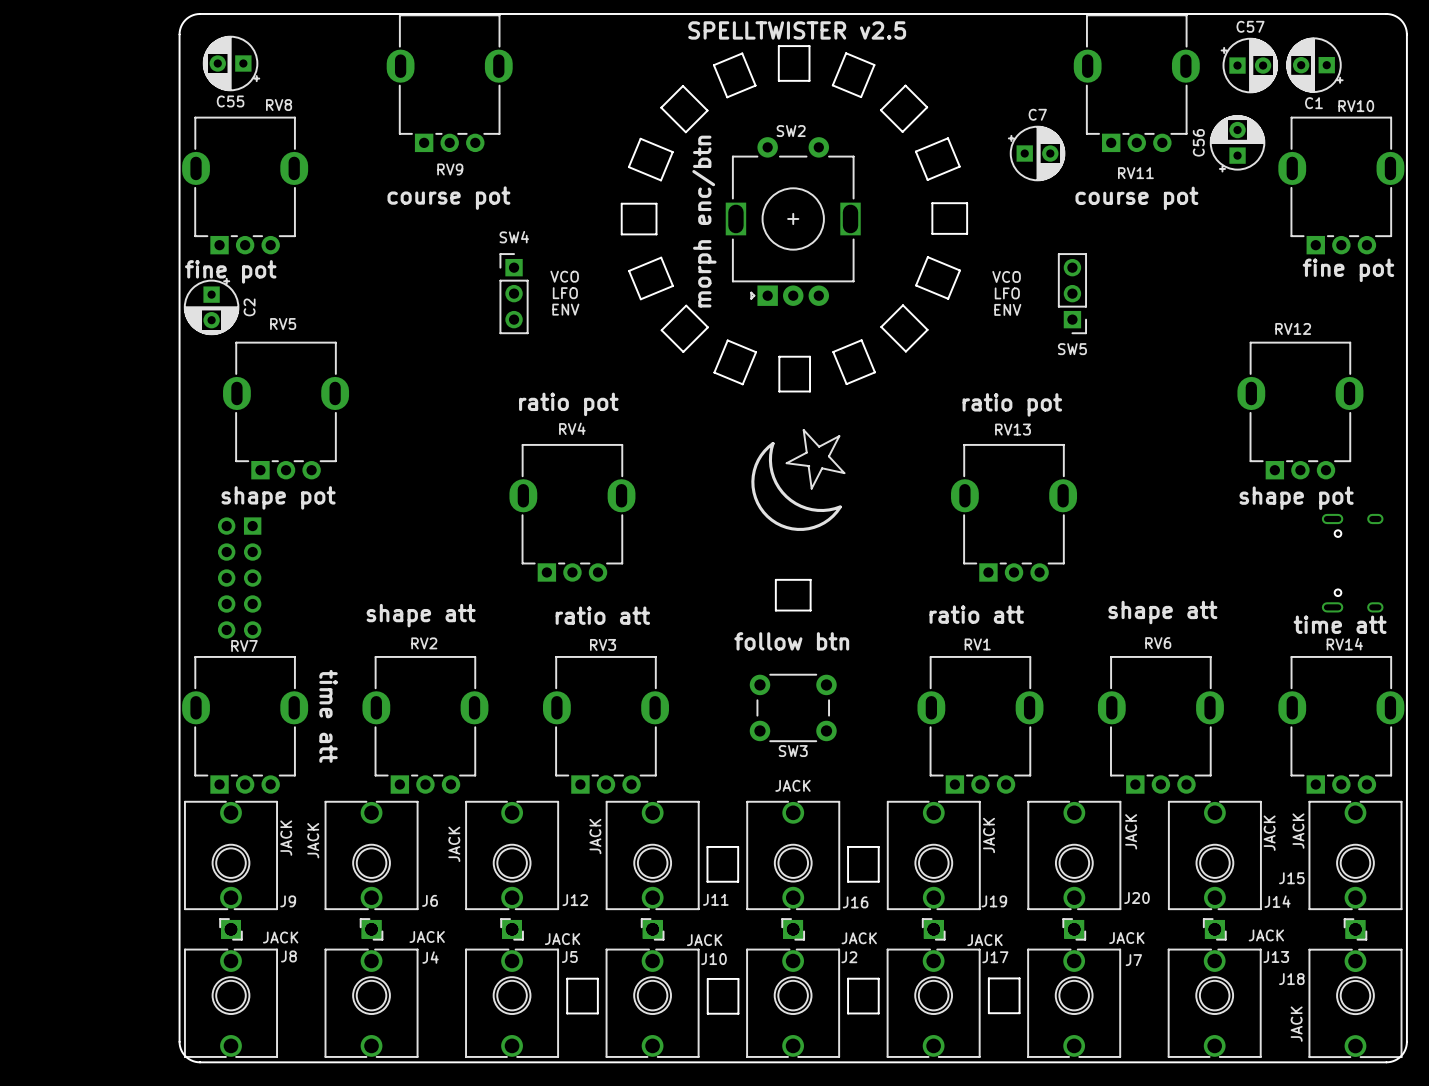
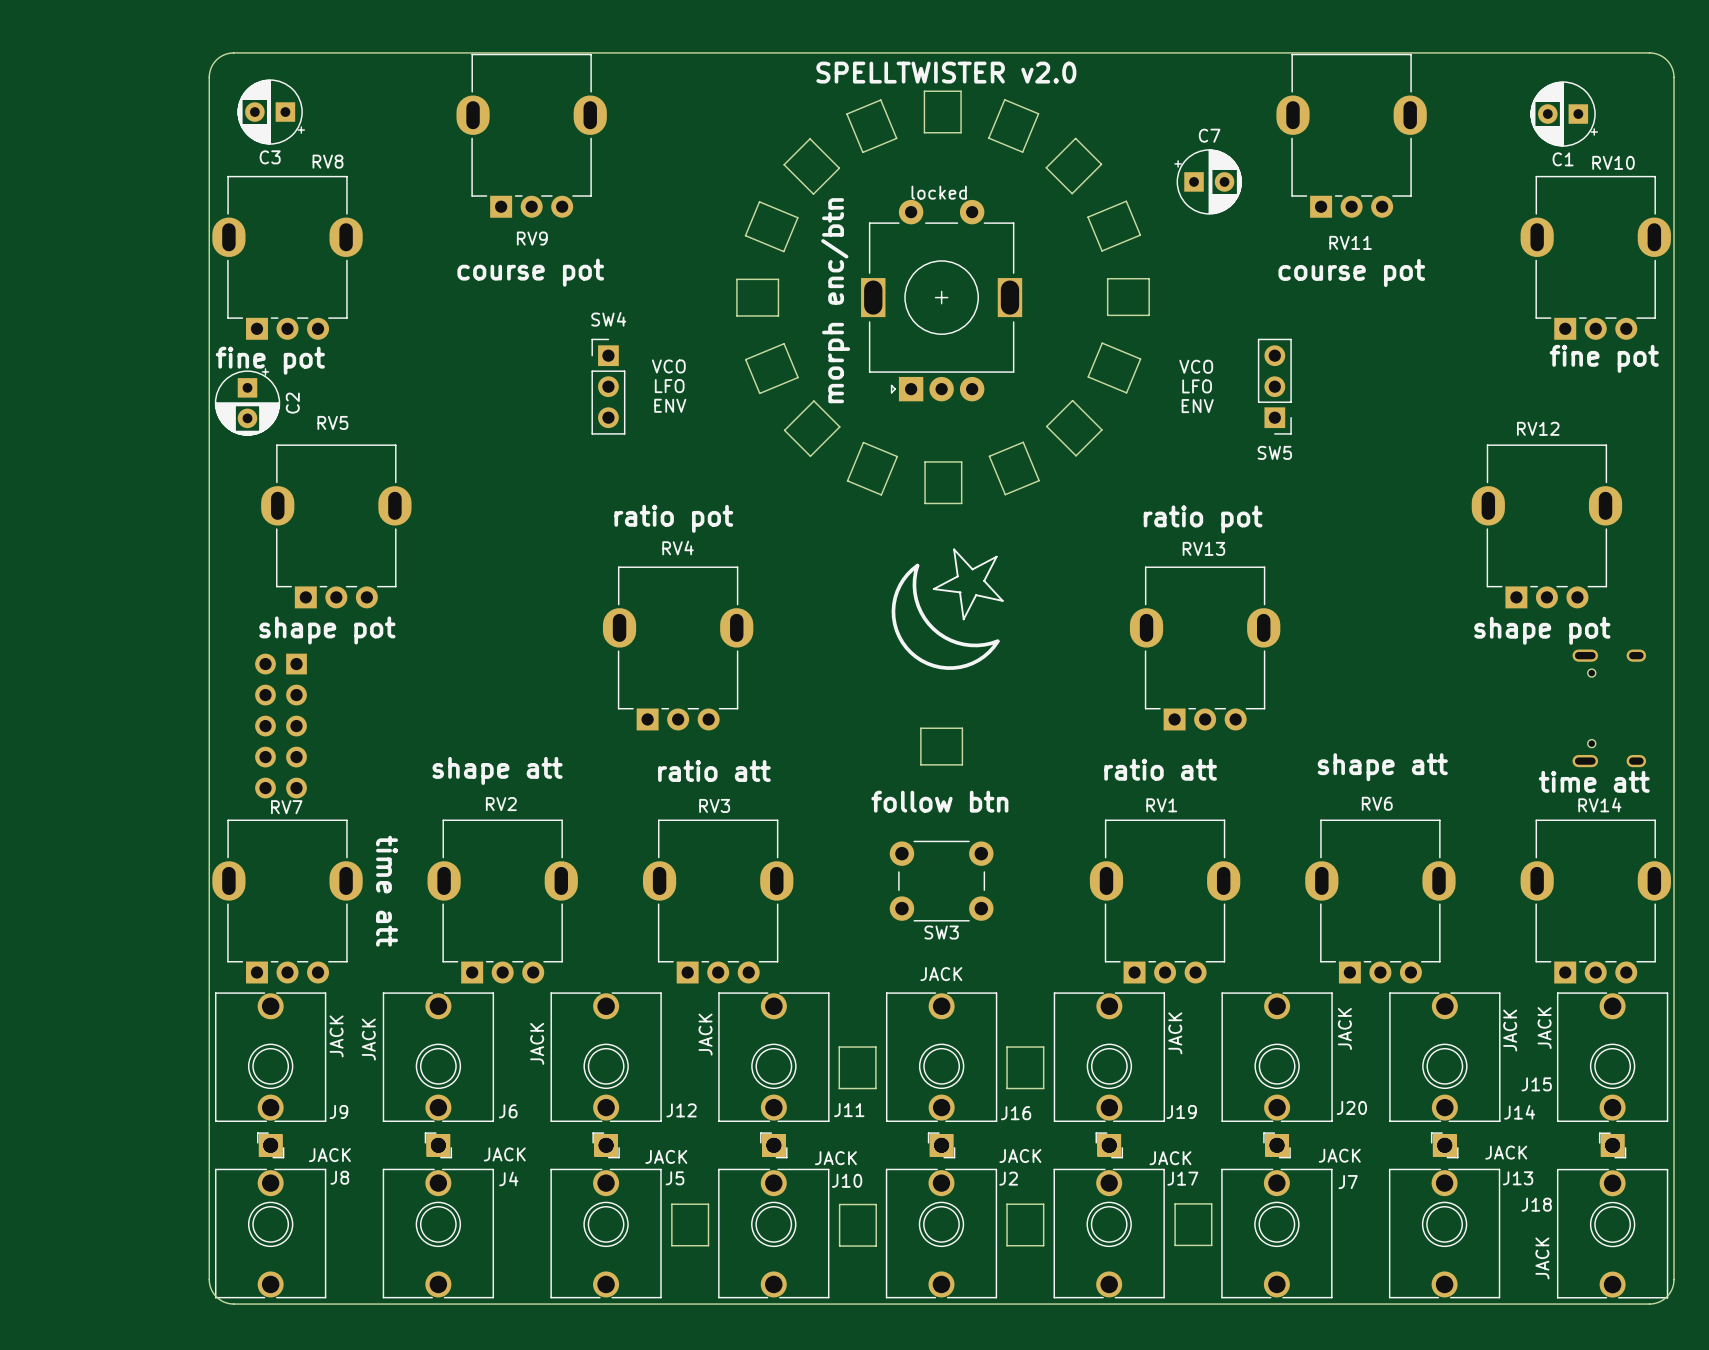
text: SPELLTWISTER v2.5 (797, 30) -> SPELLTWISTER v2.0 (946, 72)
C57: (1249, 65) -> none
C55 name: C55 (230, 101) -> C3 (270, 157)
SW2 name: SW2 (791, 131) -> locked (939, 192)
C56: (1237, 143) -> none
C7 position: (1036, 153) -> (1208, 181)

